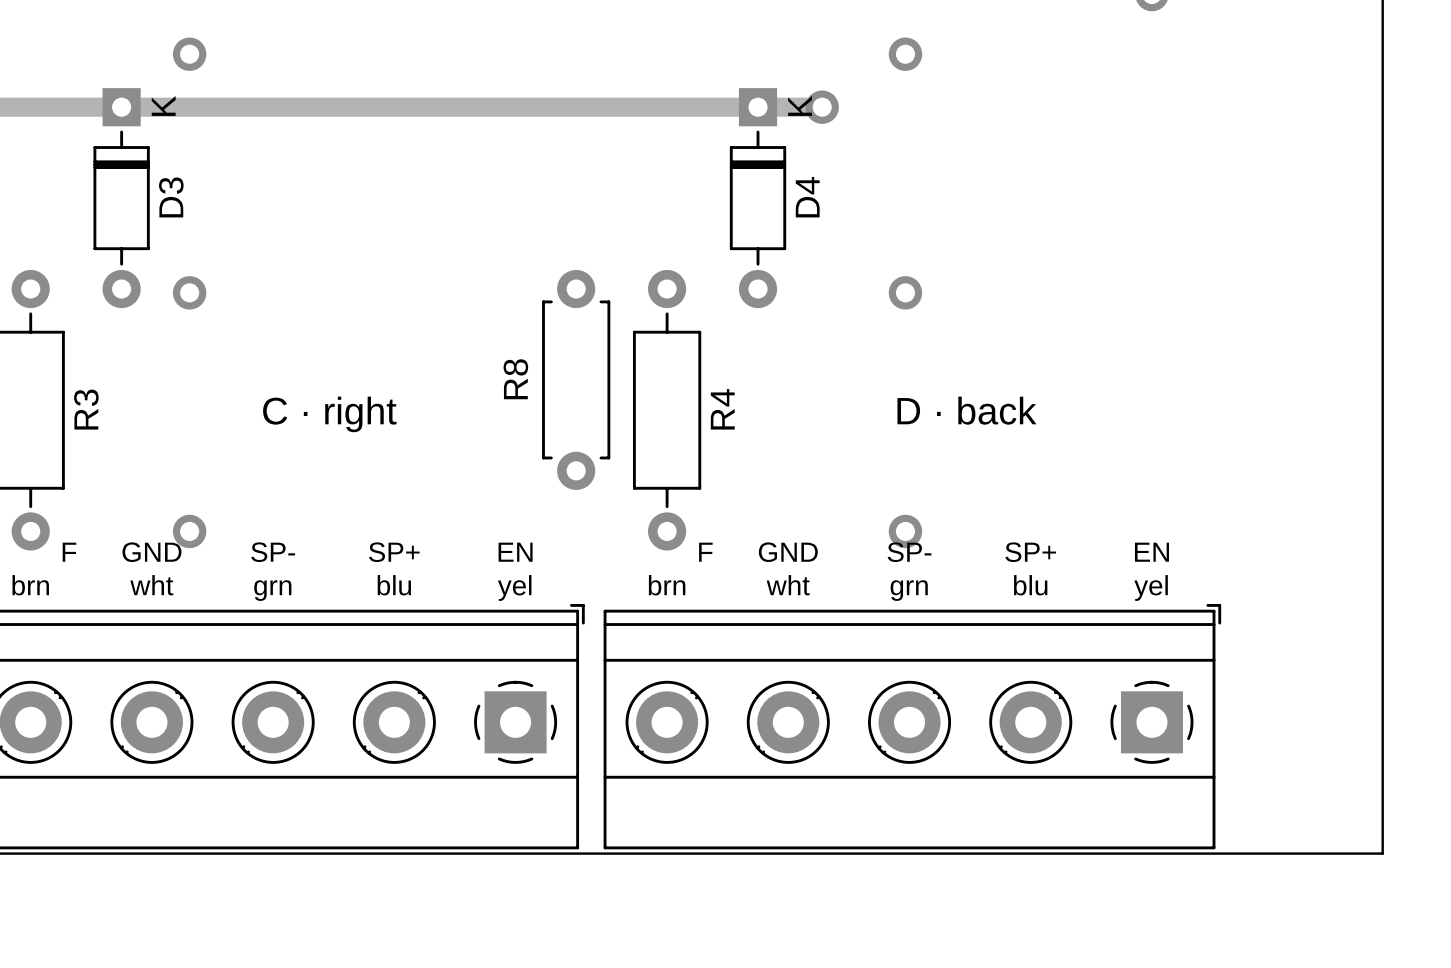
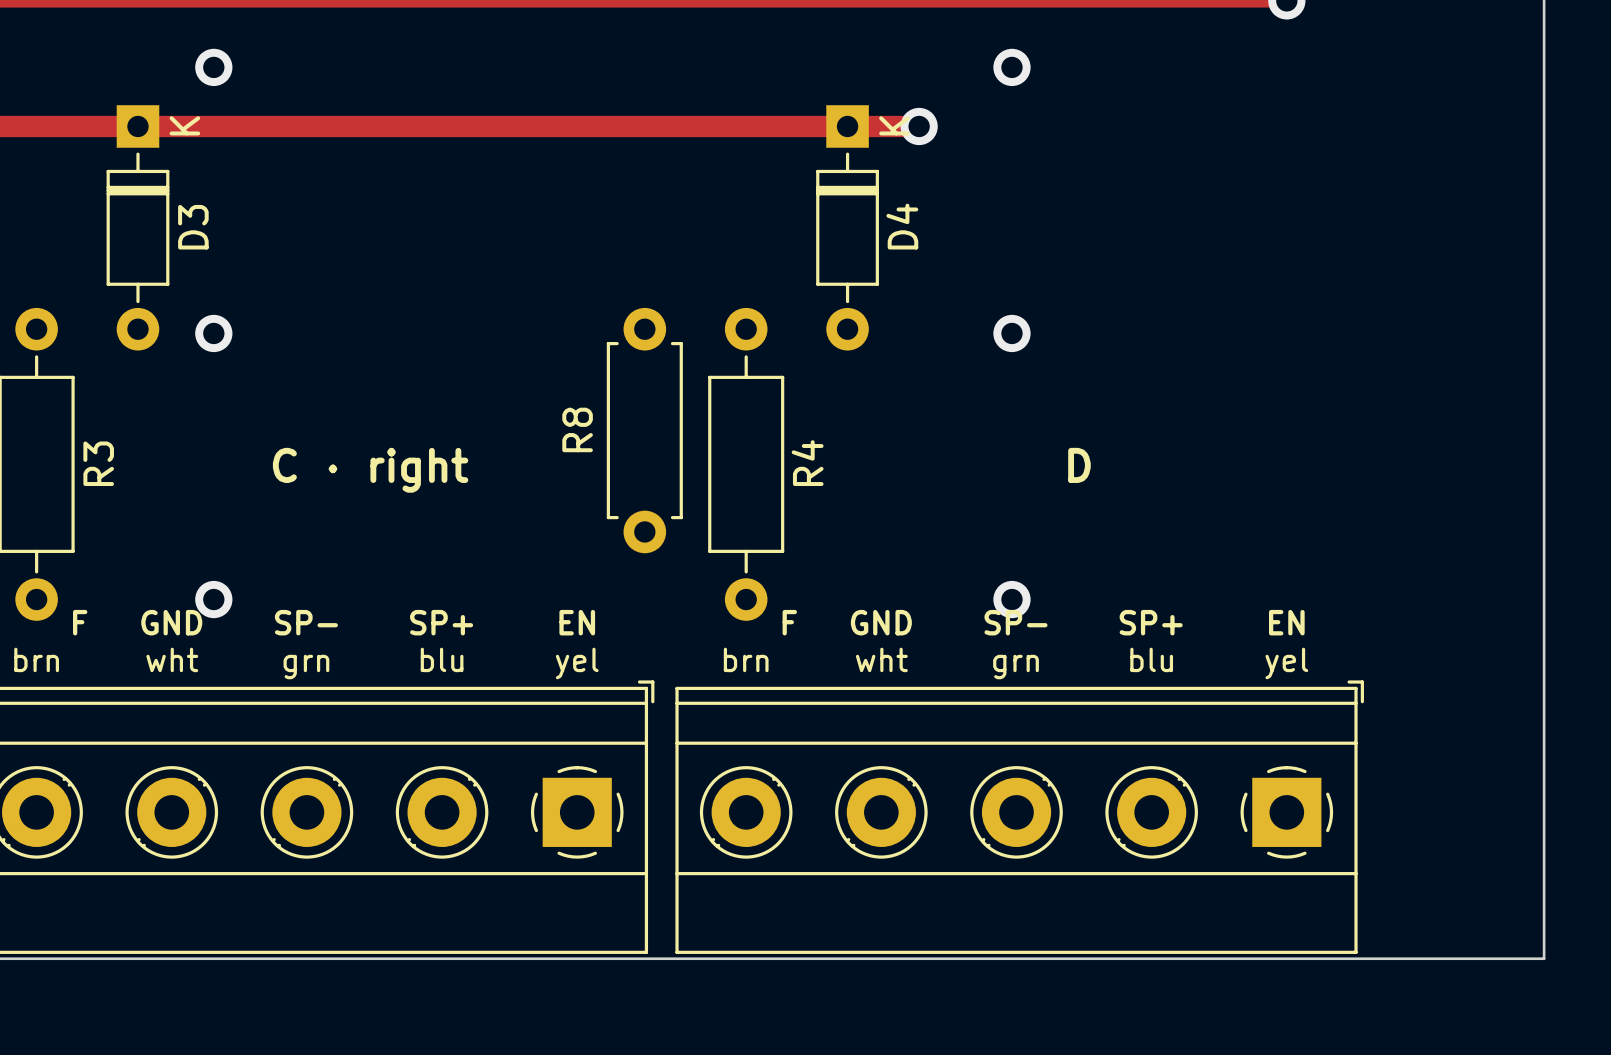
text: D · back (966, 410) -> D (1079, 465)

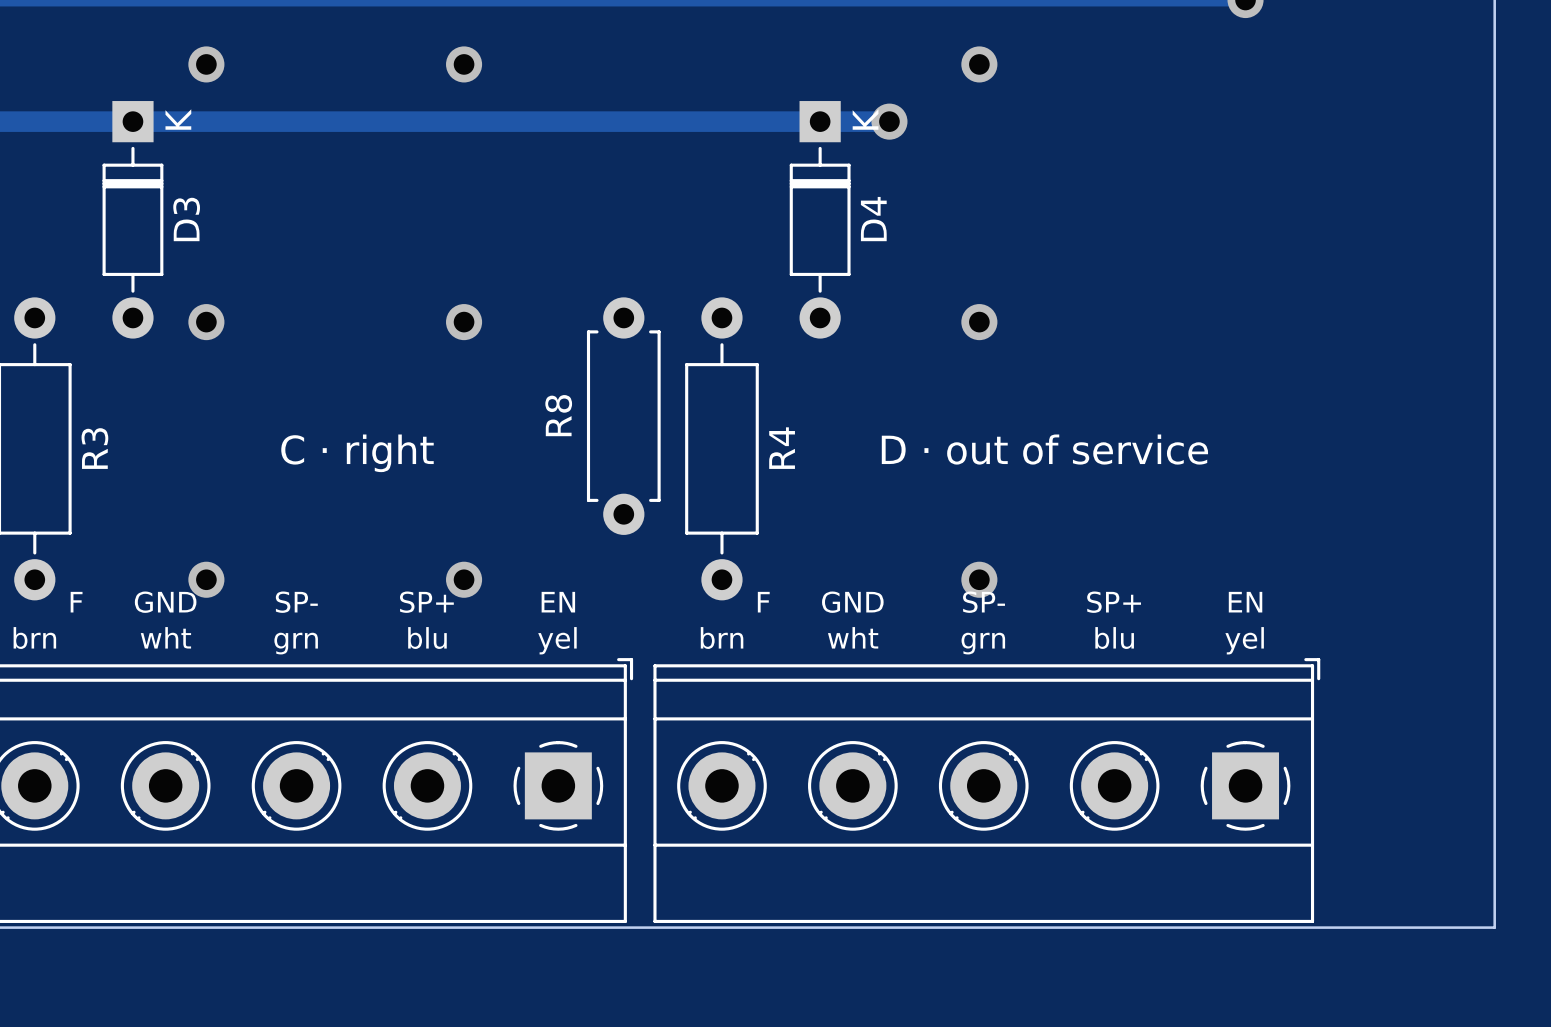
via: none -> (464, 64)
via: none -> (464, 322)
text: D (1079, 465) -> D · out of service (1044, 449)
via: none -> (464, 579)

